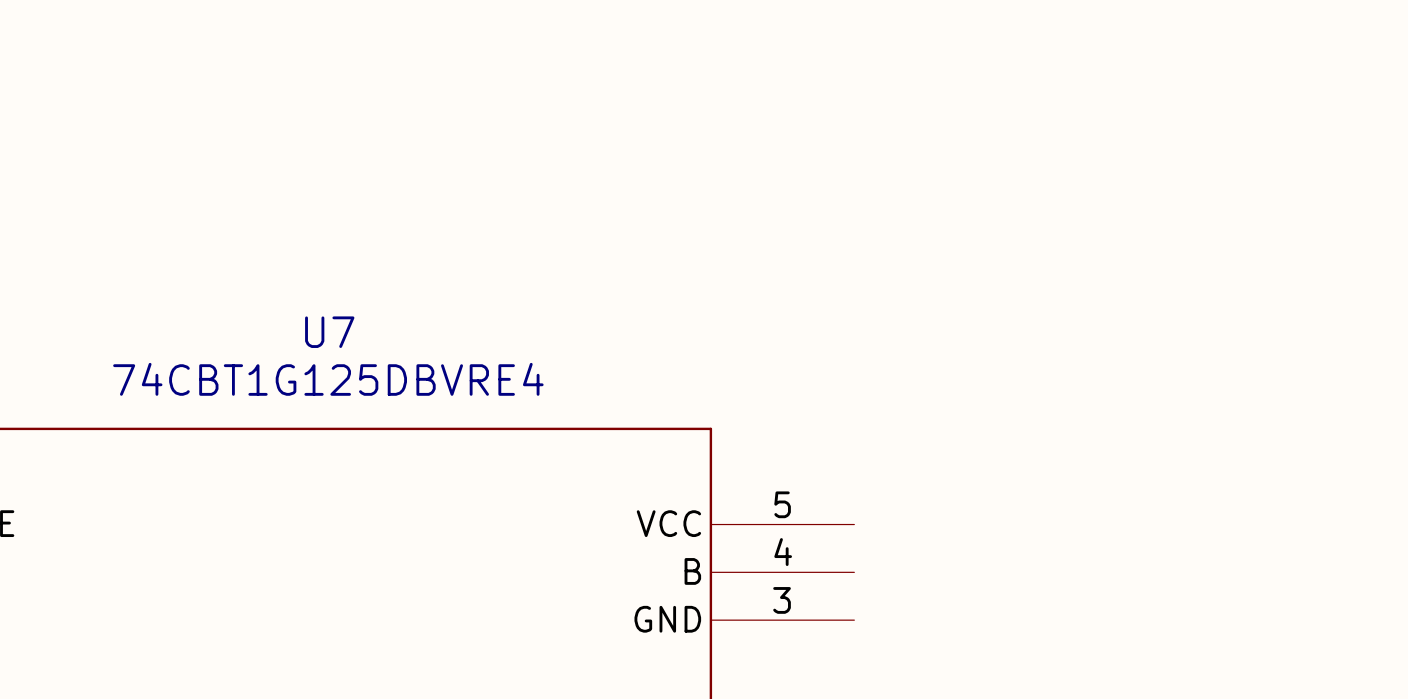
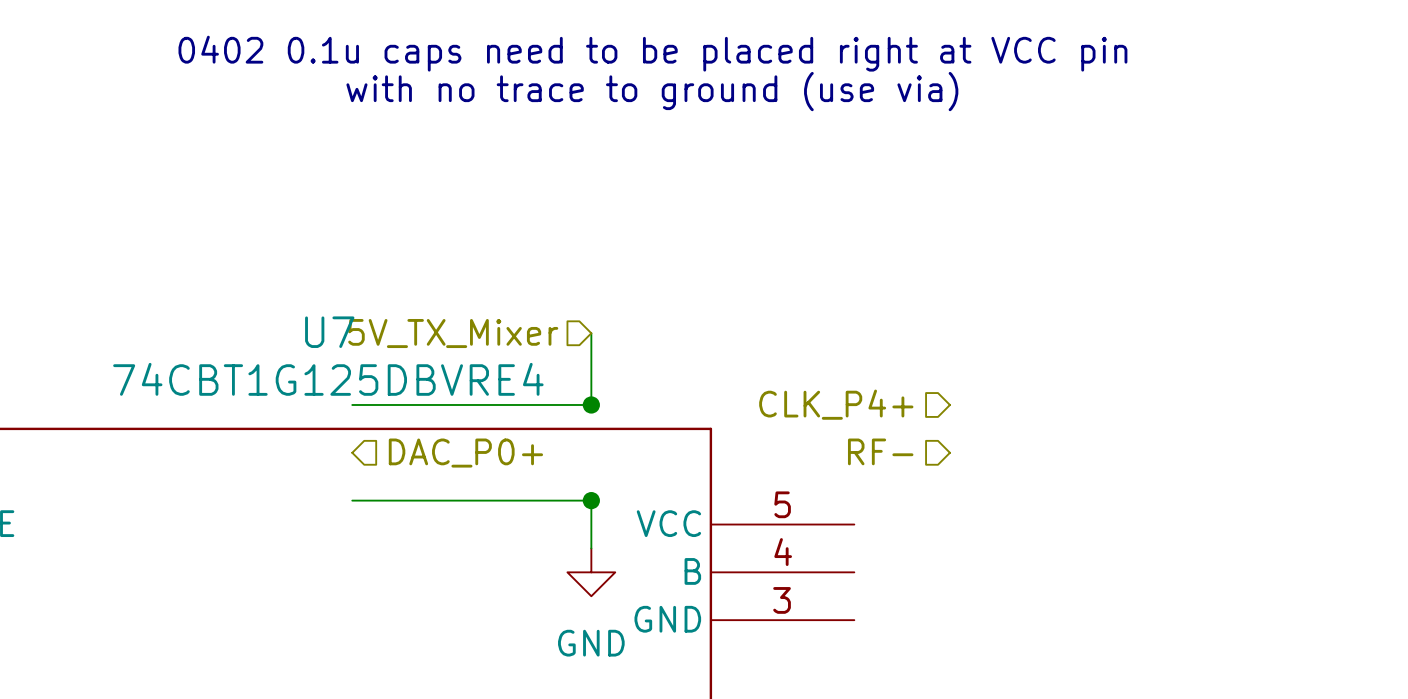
text: none -> 0402 0.1u caps need to be placed right at VCC pin (652, 53)
text: none -> with no trace to ground (use via) (652, 91)
hierarchical label: none -> 5V_TX_Mixer (453, 333)
wire: none -> (591, 333) (591, 404) (352, 404)
junction: none -> (591, 404)
hierarchical label: none -> CLK_P4+ (836, 404)
hierarchical label: none -> RF- (880, 451)
hierarchical label: none -> DAC_P0+ (465, 453)
wire: none -> (352, 500) (591, 500) (591, 548)
junction: none -> (591, 500)
power symbol: none -> GND (591, 572)

